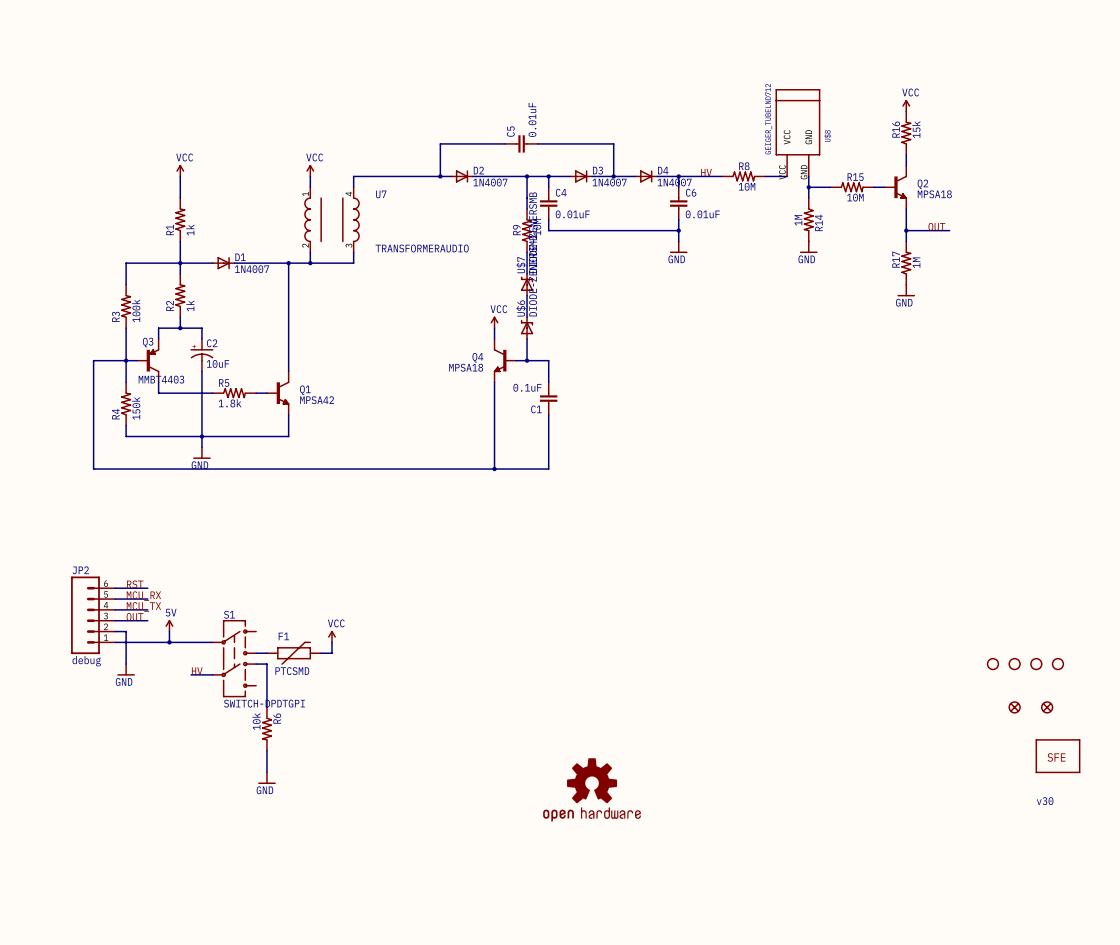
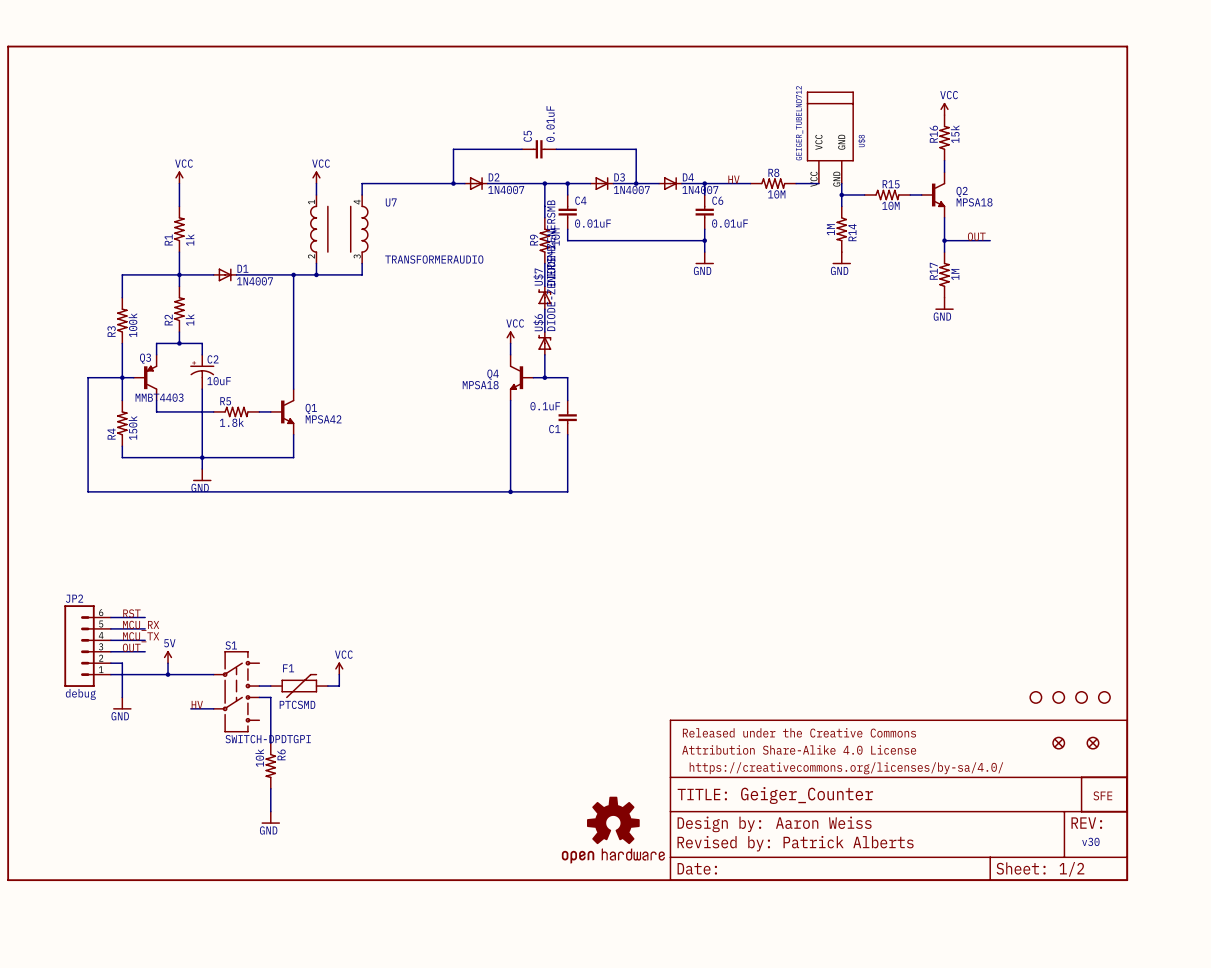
part: none -> (567, 463)
part: none -> (898, 800)
text: none -> Aaron Weiss (823, 822)
text: none -> Revised by: Patrick Alberts (795, 843)

